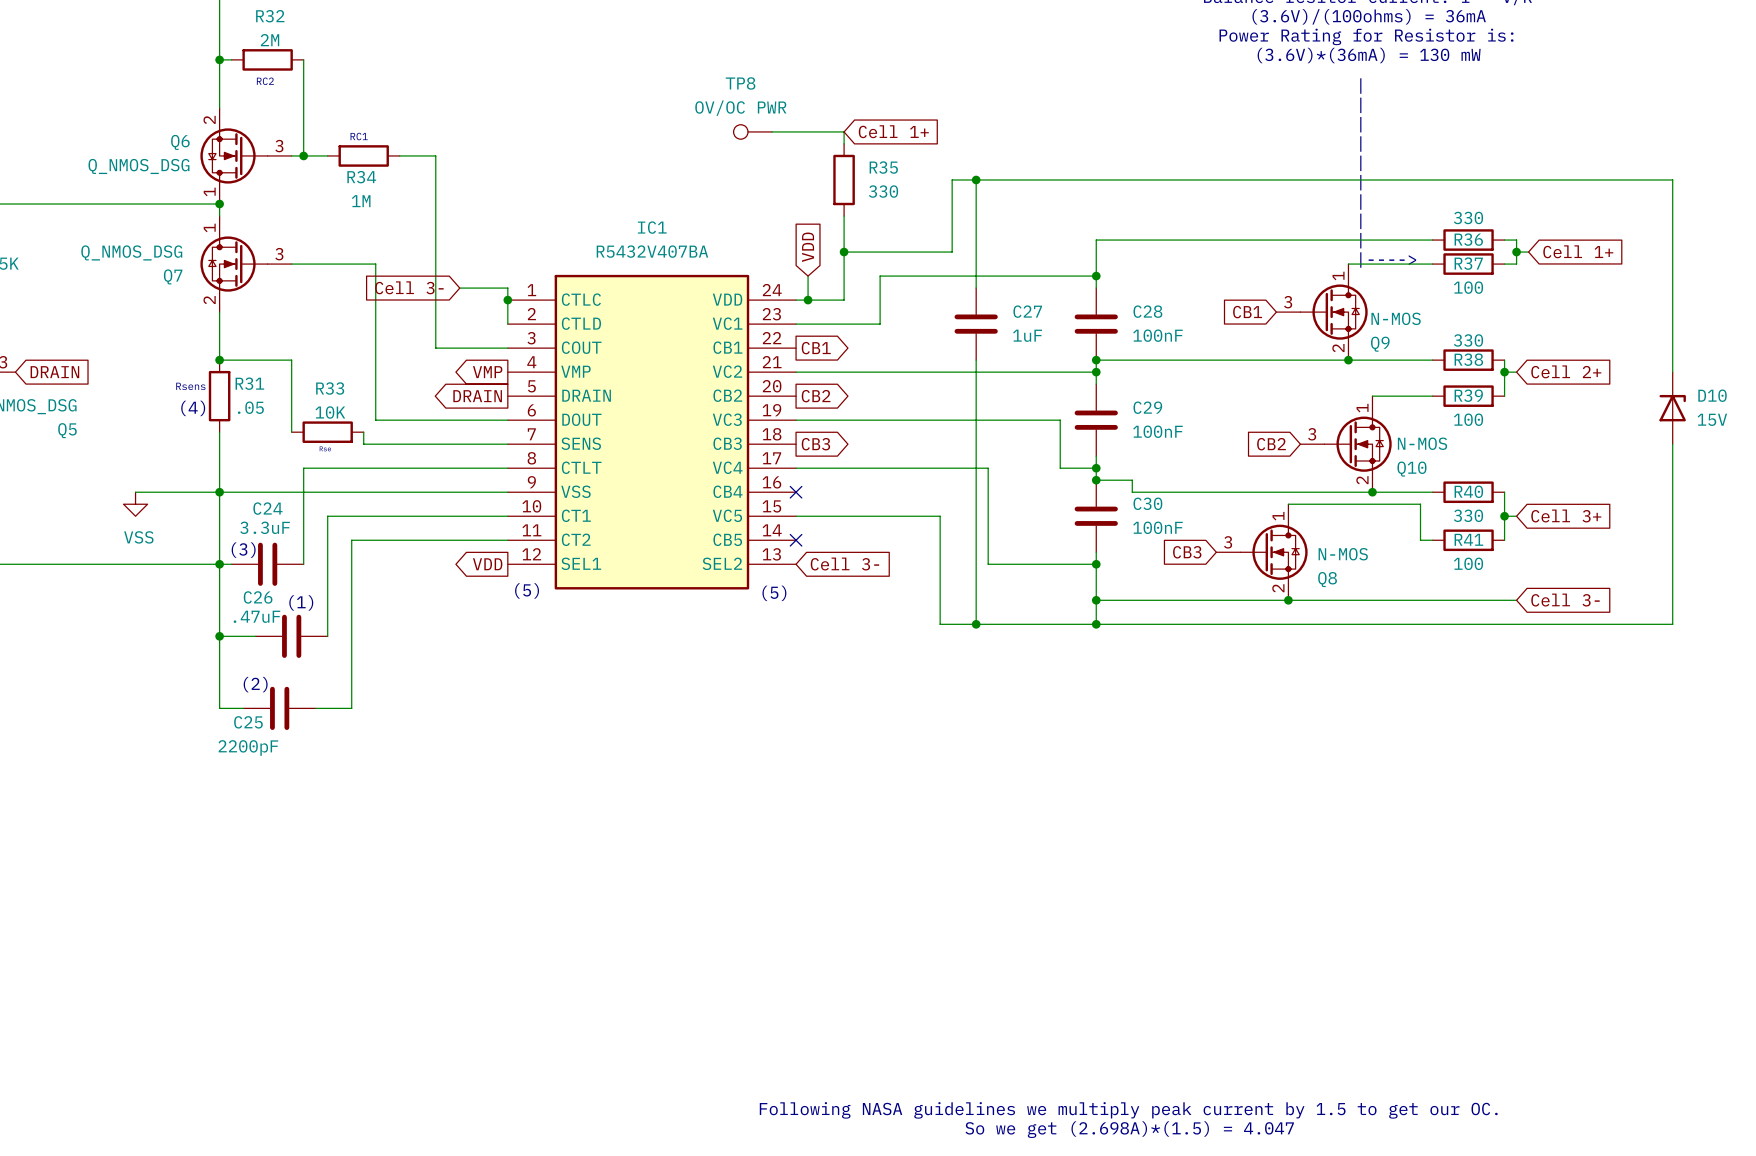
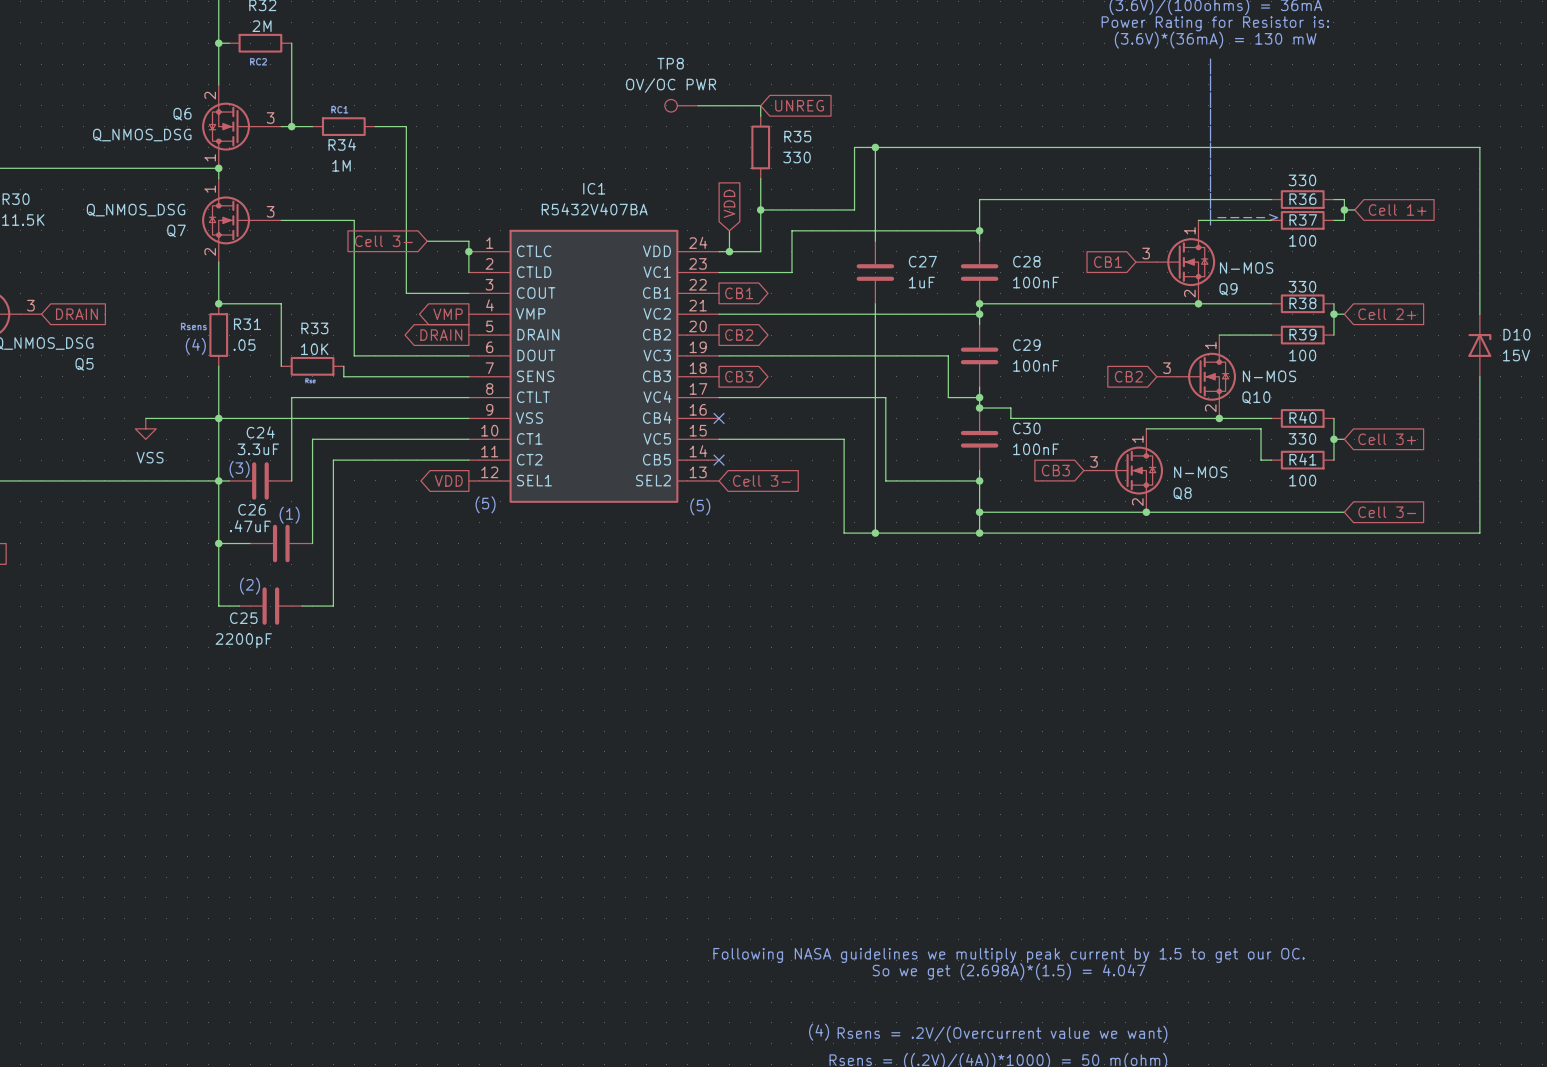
global label: Cell 1+ (893, 131) -> UNREG (799, 105)

